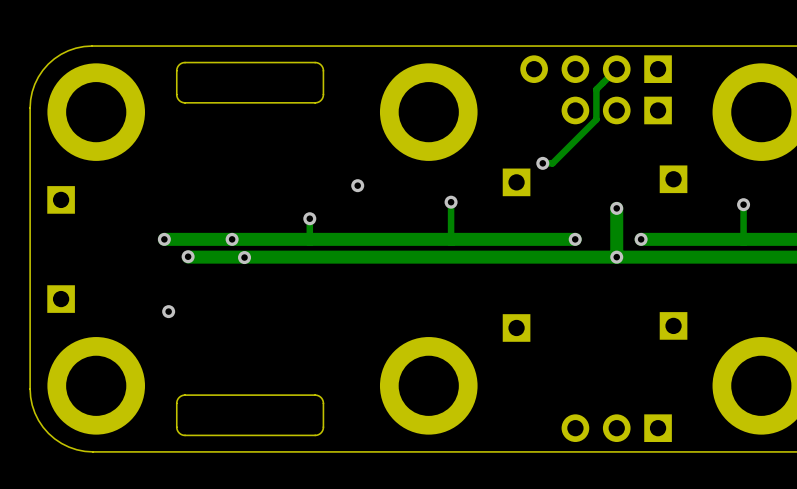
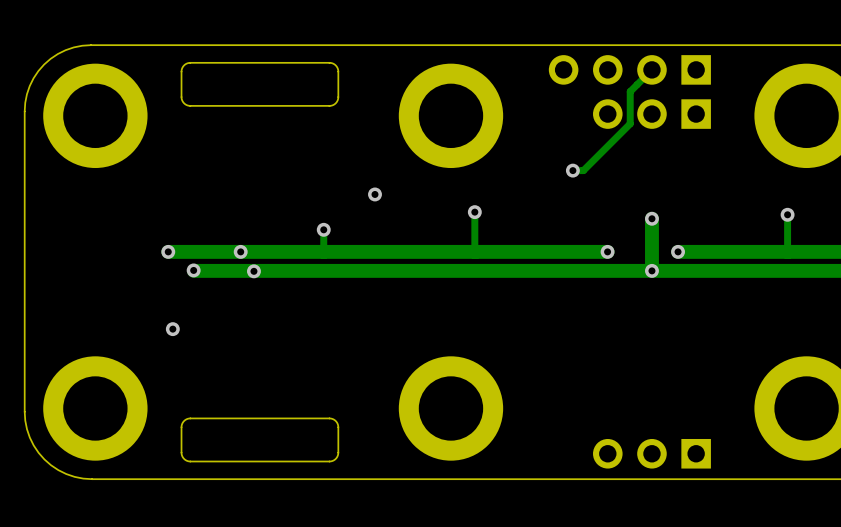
part: (673, 179) -> none
part: (516, 182) -> none
part: (61, 199) -> none
part: (61, 299) -> none
part: (673, 325) -> none
part: (516, 327) -> none

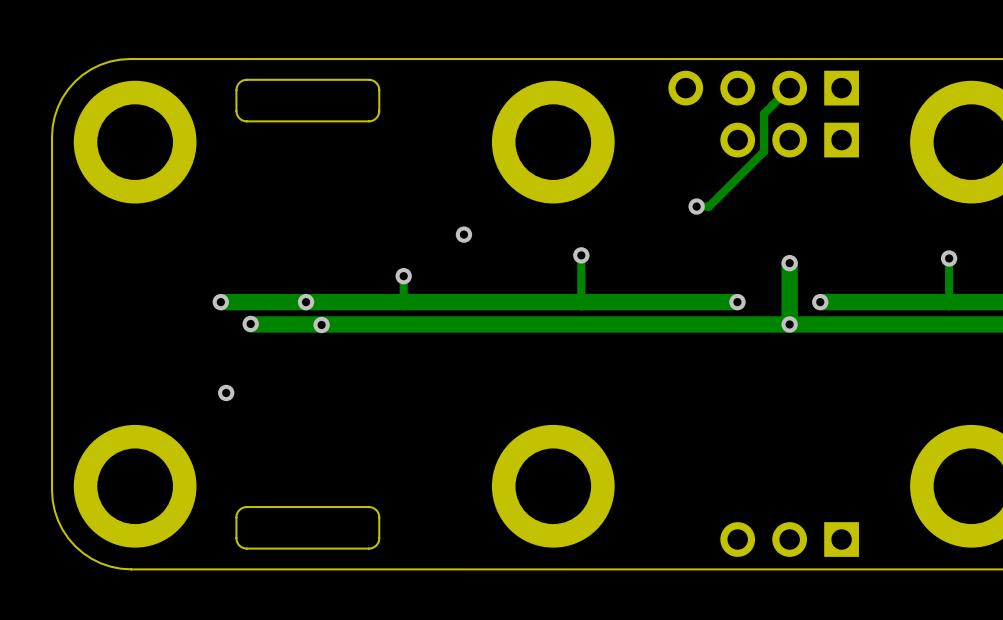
board edge: (294, 62) (331, 63) (336, 66) (338, 71) -> none
board edge: (338, 71) (338, 99) (330, 105) (189, 105) (182, 100) (181, 89) -> (368, 79) (376, 82) (379, 90) (378, 113) (371, 121) (245, 121) (239, 118) (236, 110)
board edge: (338, 427) (335, 421) (329, 418) (190, 418) (182, 422) (181, 434) -> (368, 548) (376, 545) (379, 538) (378, 514) (371, 507) (245, 507) (238, 511) (236, 517)
board edge: (338, 427) (338, 453) (334, 459) (329, 461) (294, 461) -> none

